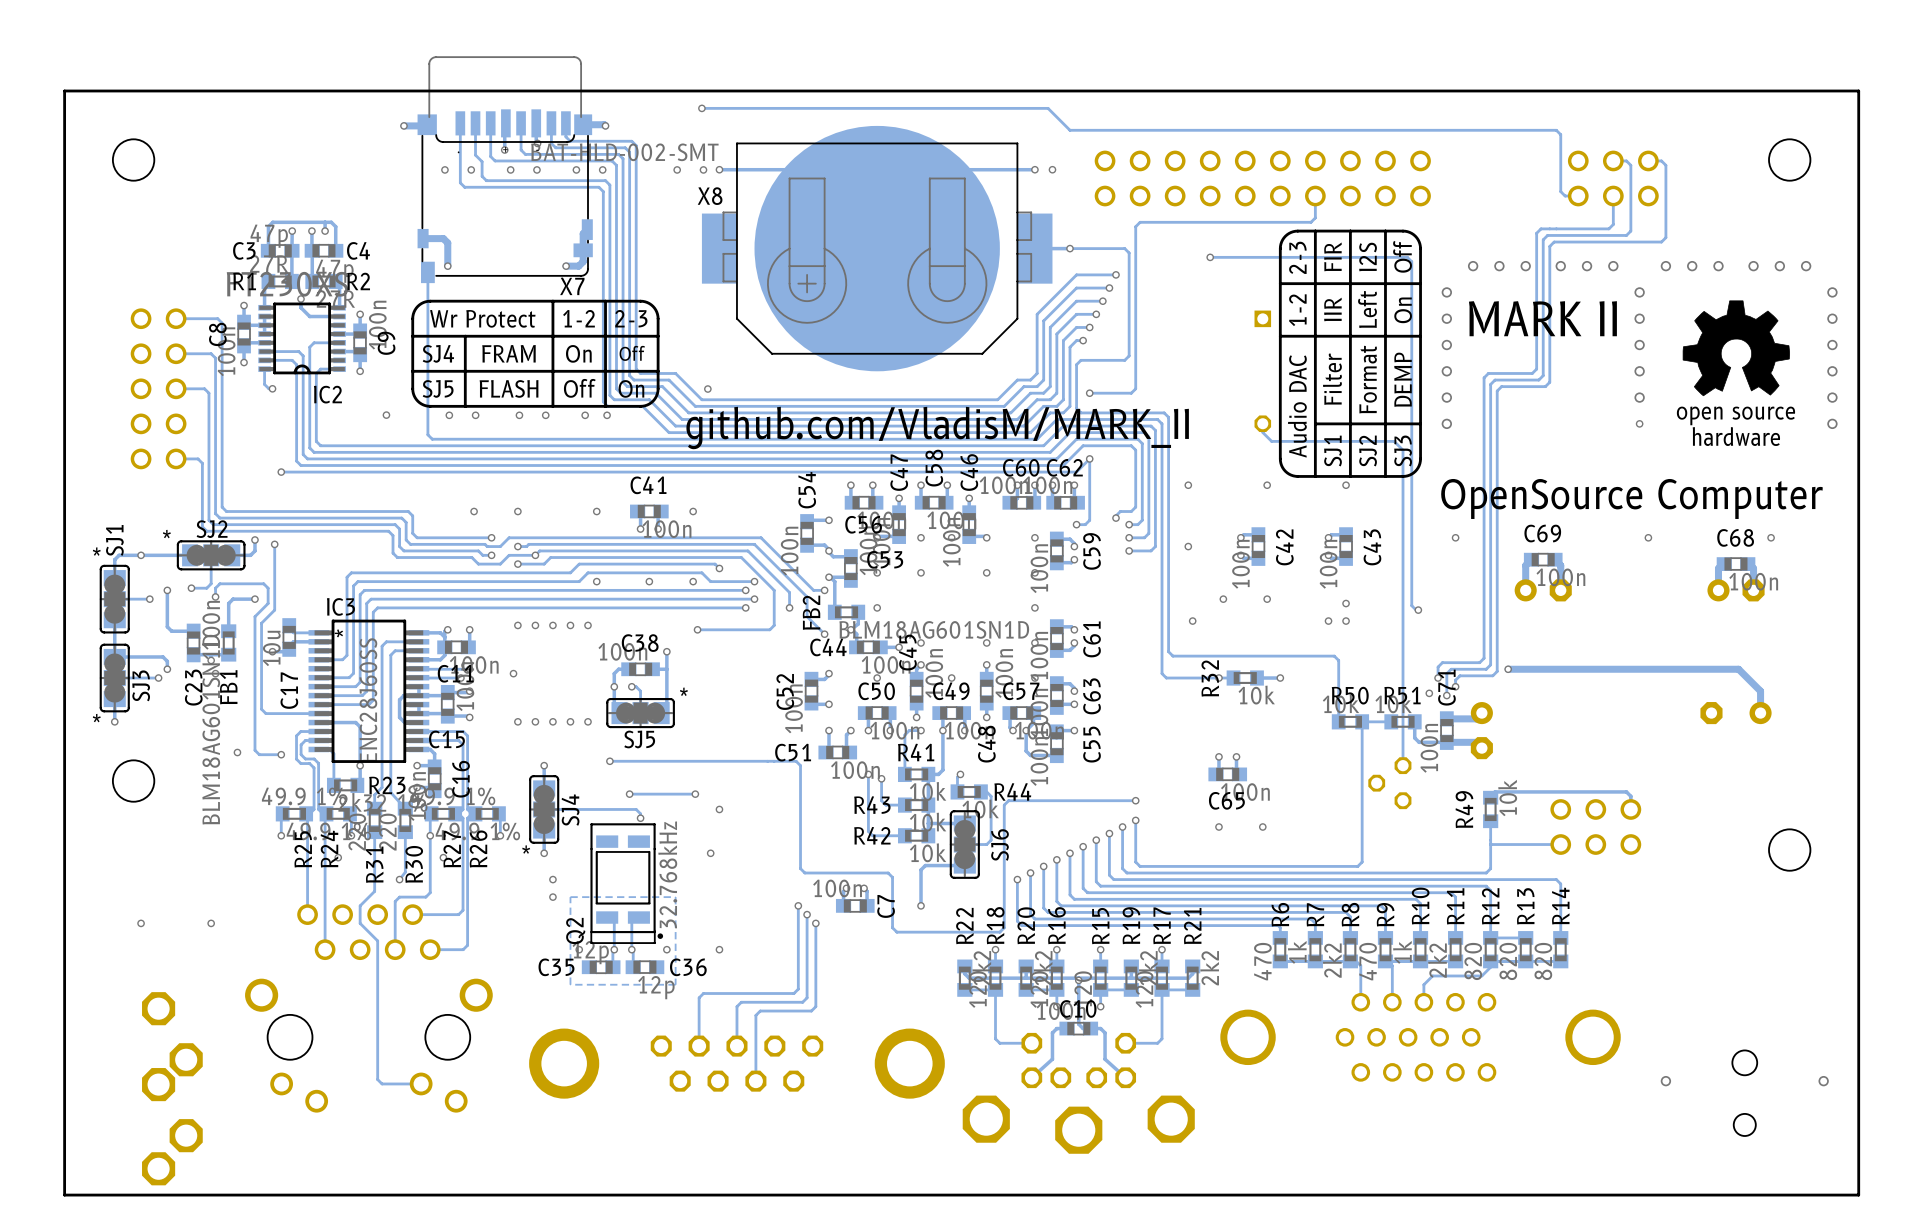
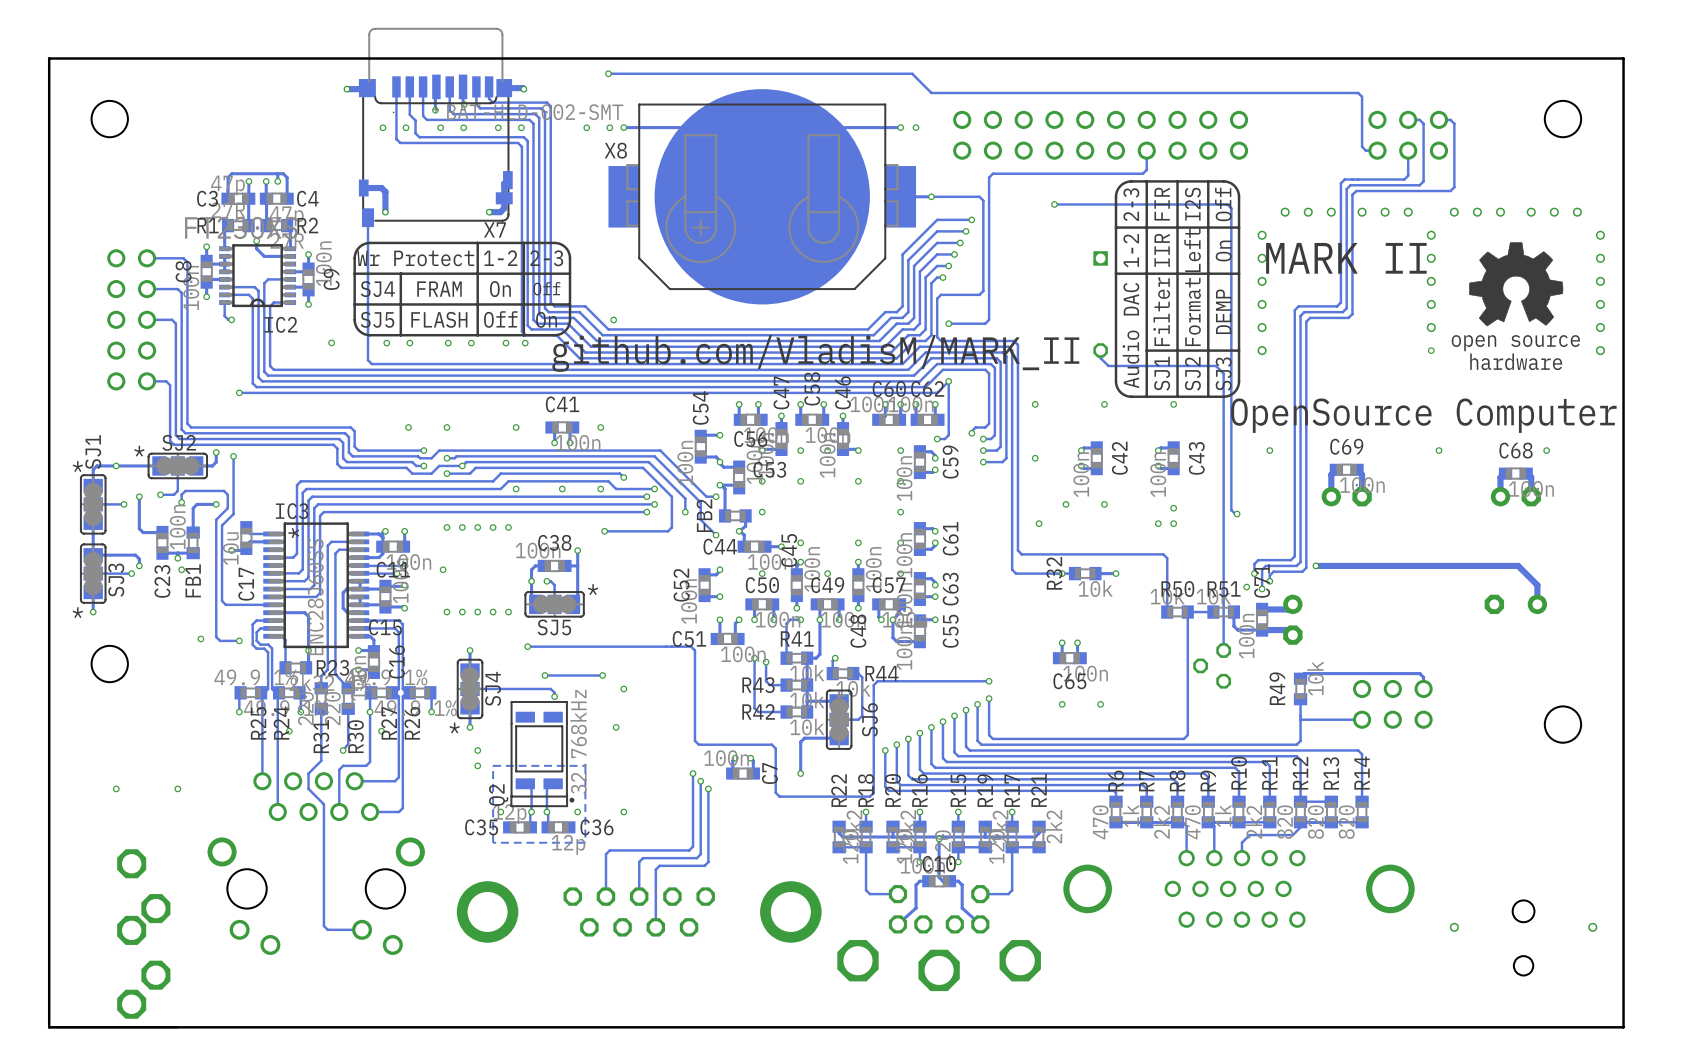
FB2 value: BLM18AG601SN1D (934, 629) -> none
FB1 value: BLM18AG601SN1D (211, 729) -> none

